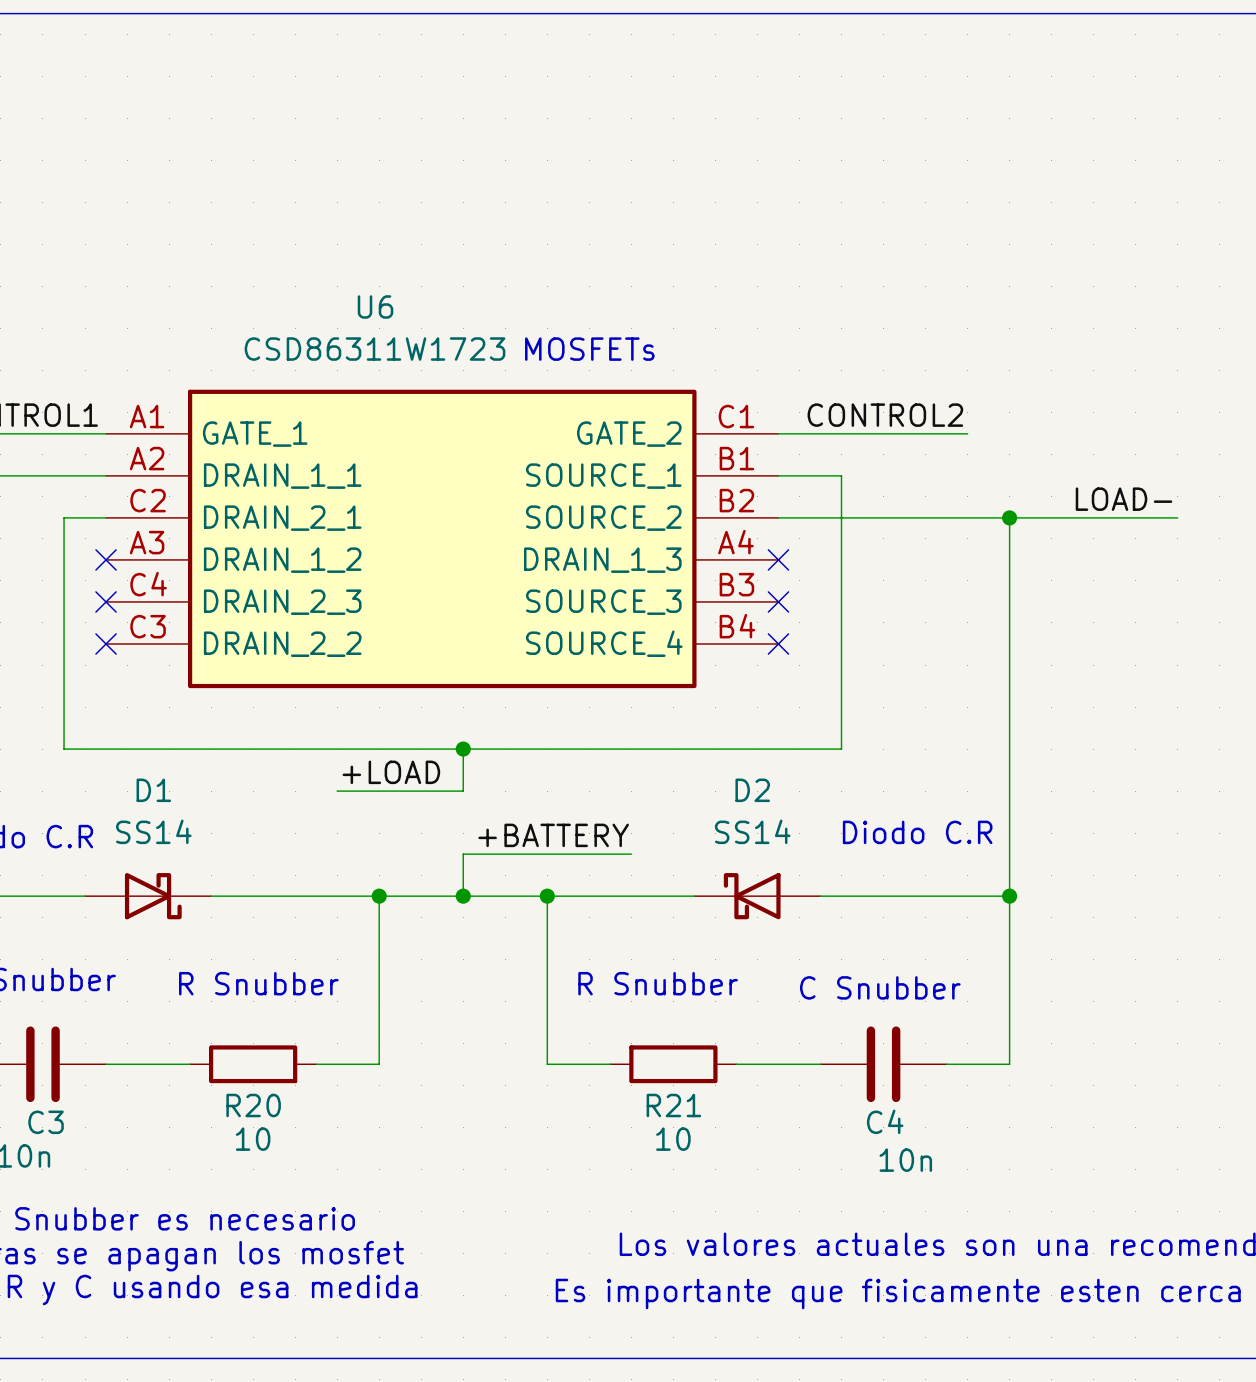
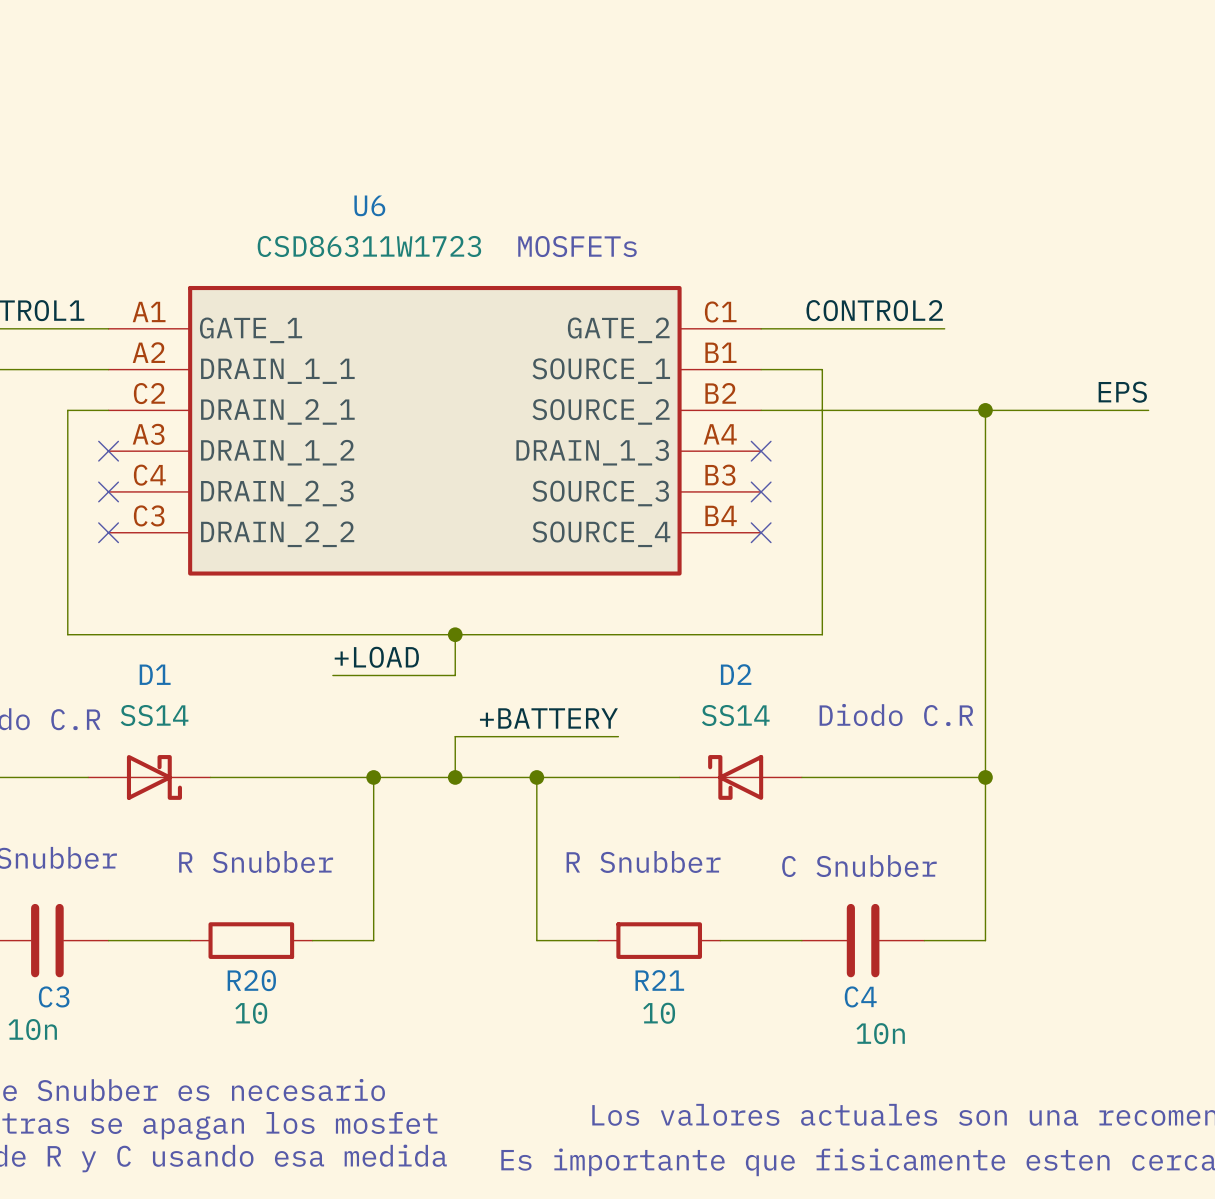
label: LOAD- (1124, 499) -> EPS (1122, 392)

